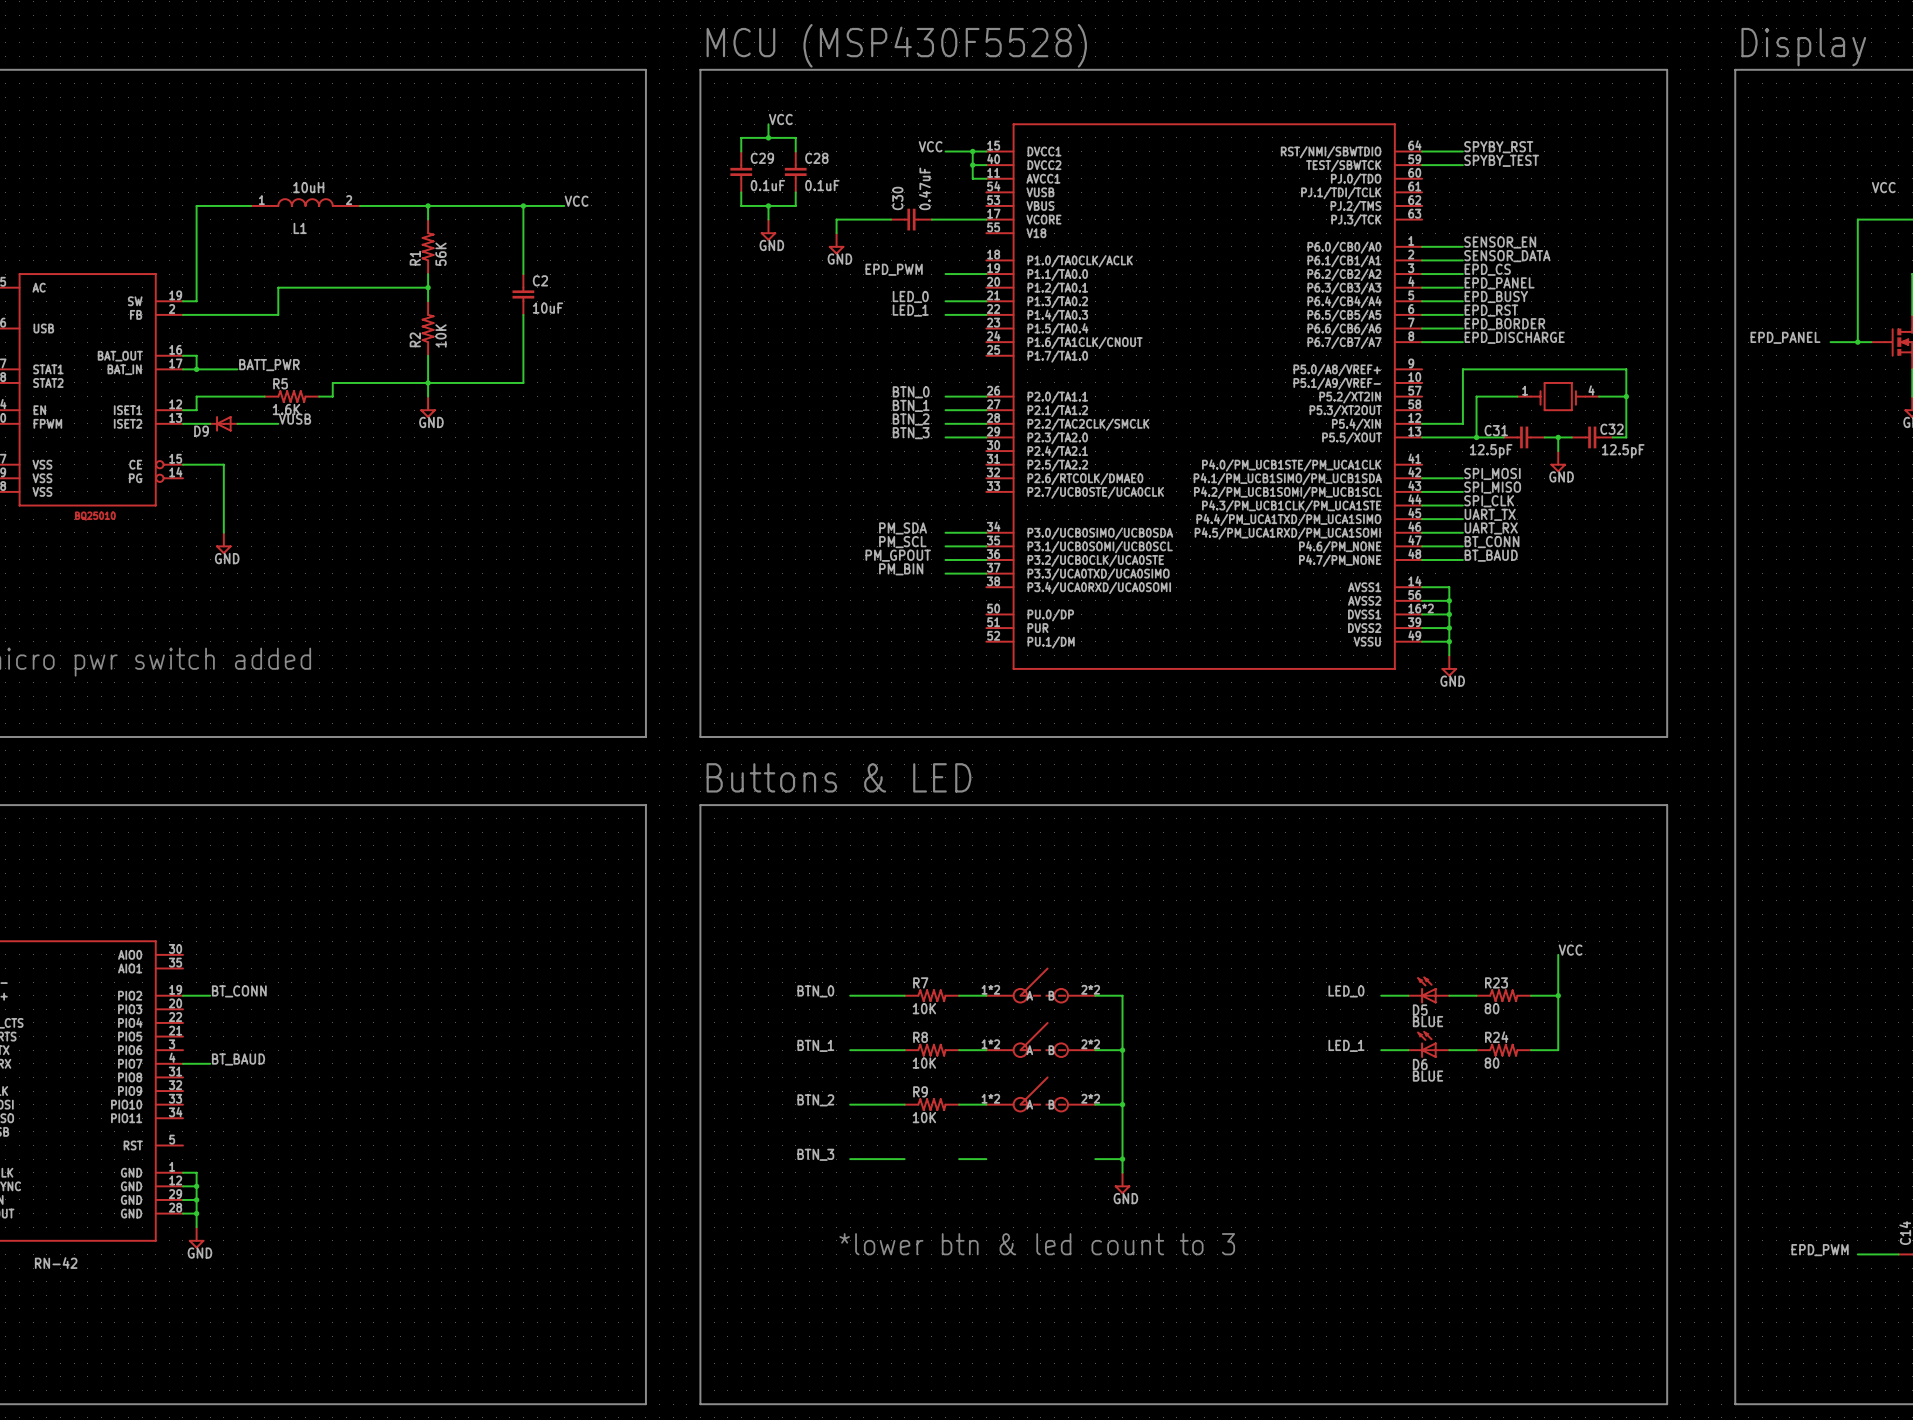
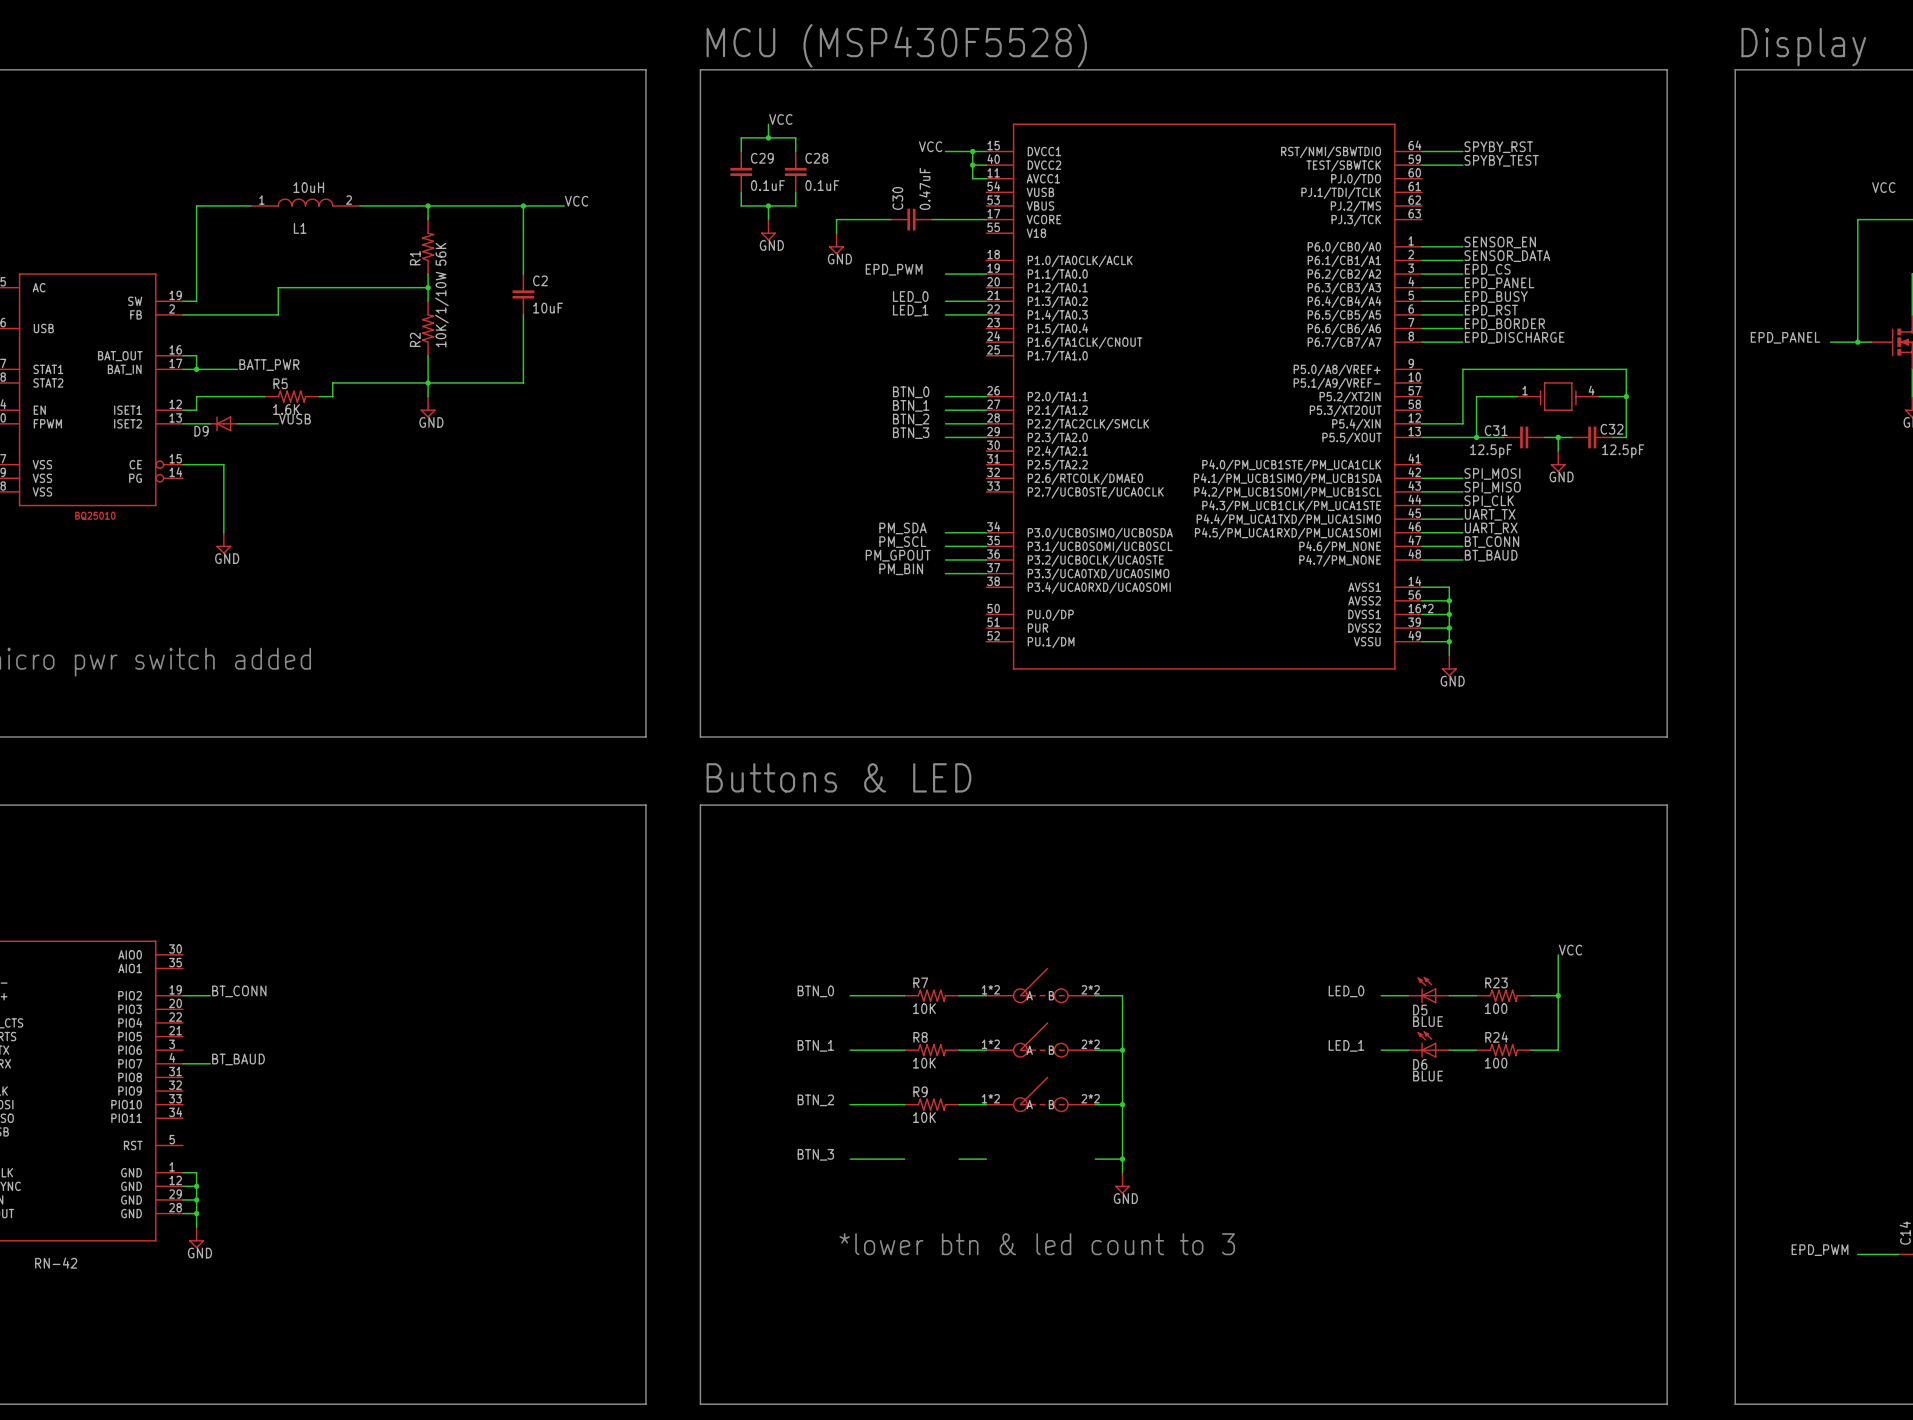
R2 value: 10K (441, 335) -> 10K/1/10W (441, 309)
R23 value: 80 (1492, 1008) -> 100 (1496, 1008)
R24 value: 80 (1492, 1063) -> 100 (1496, 1063)

